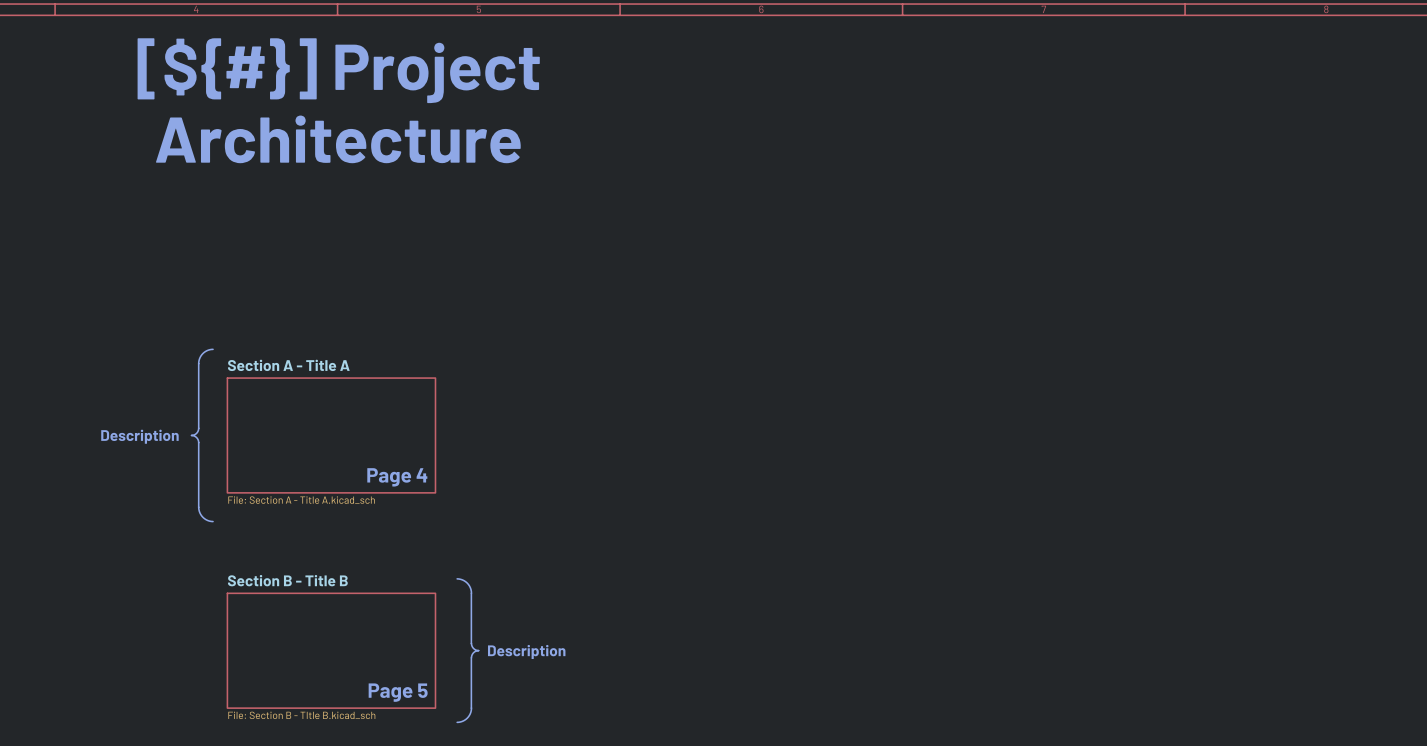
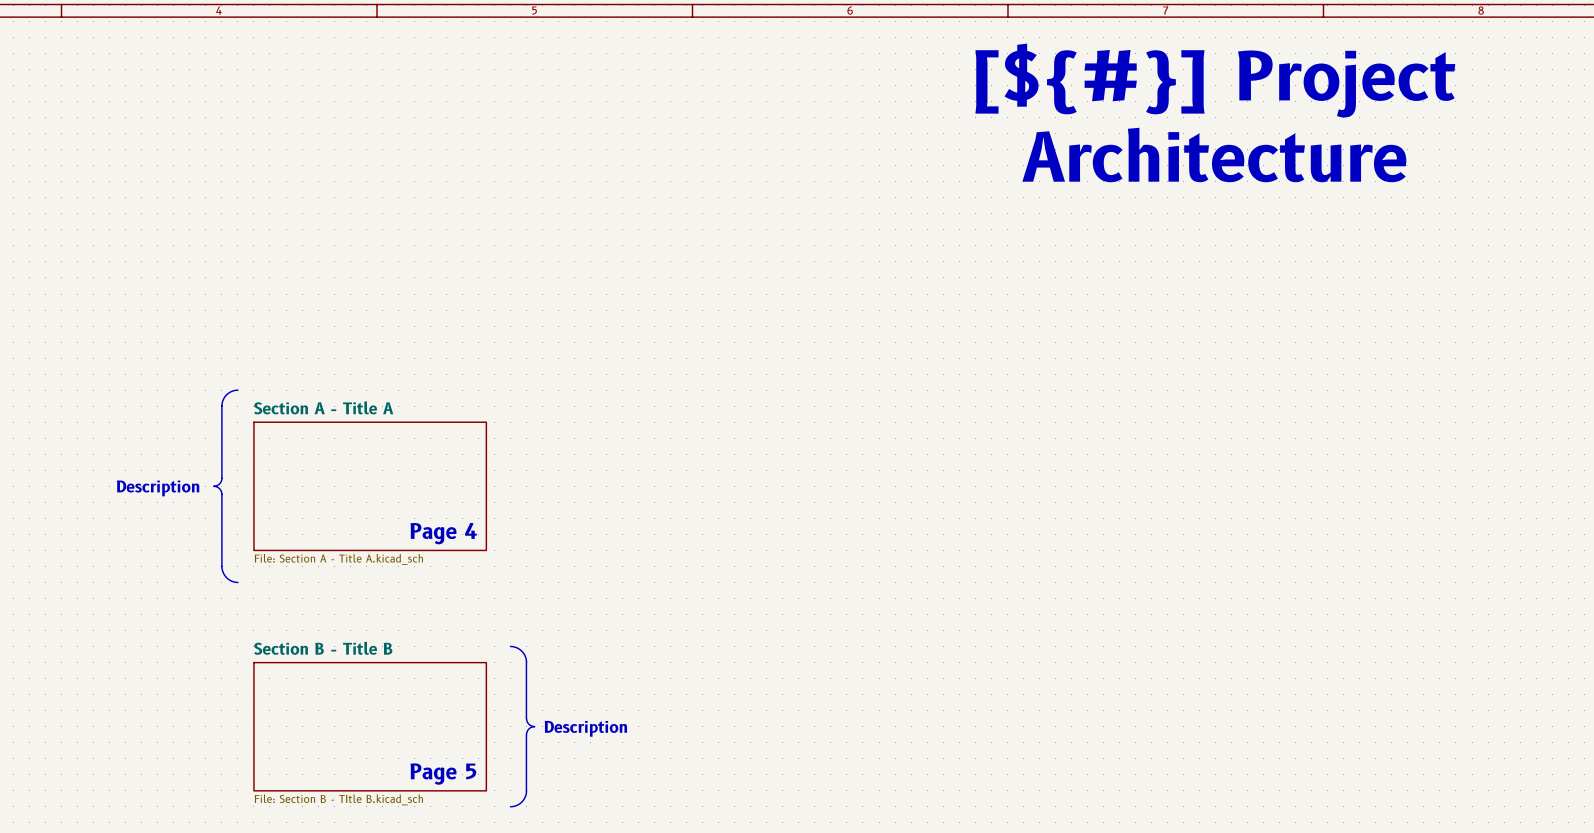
text: [${#}] Project (338, 70) -> none
text: none -> [${#}] Project (1215, 80)
text: Architecture (338, 139) -> none
text: none -> Architecture (1214, 155)

